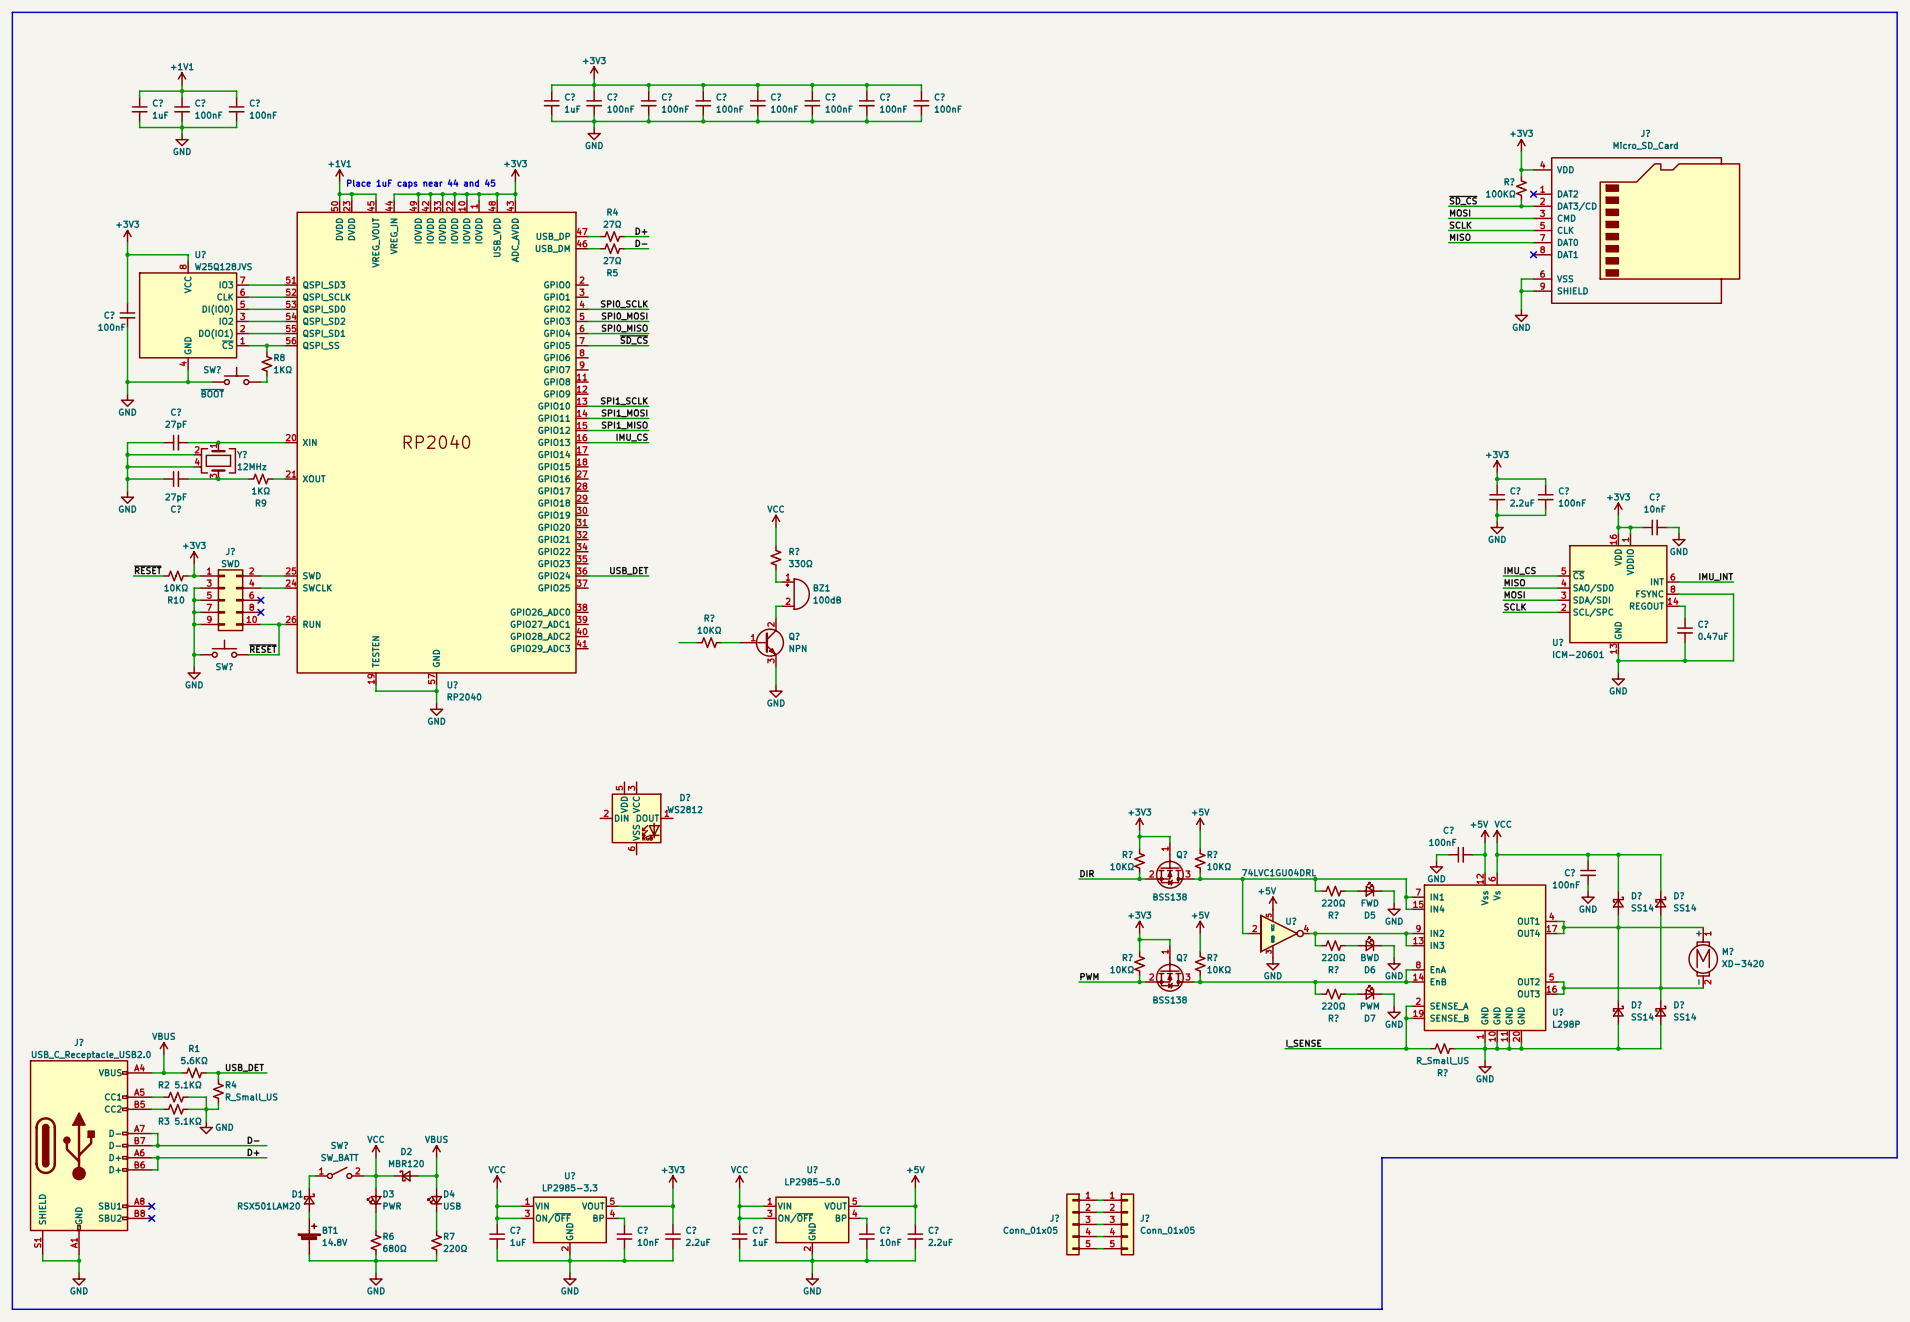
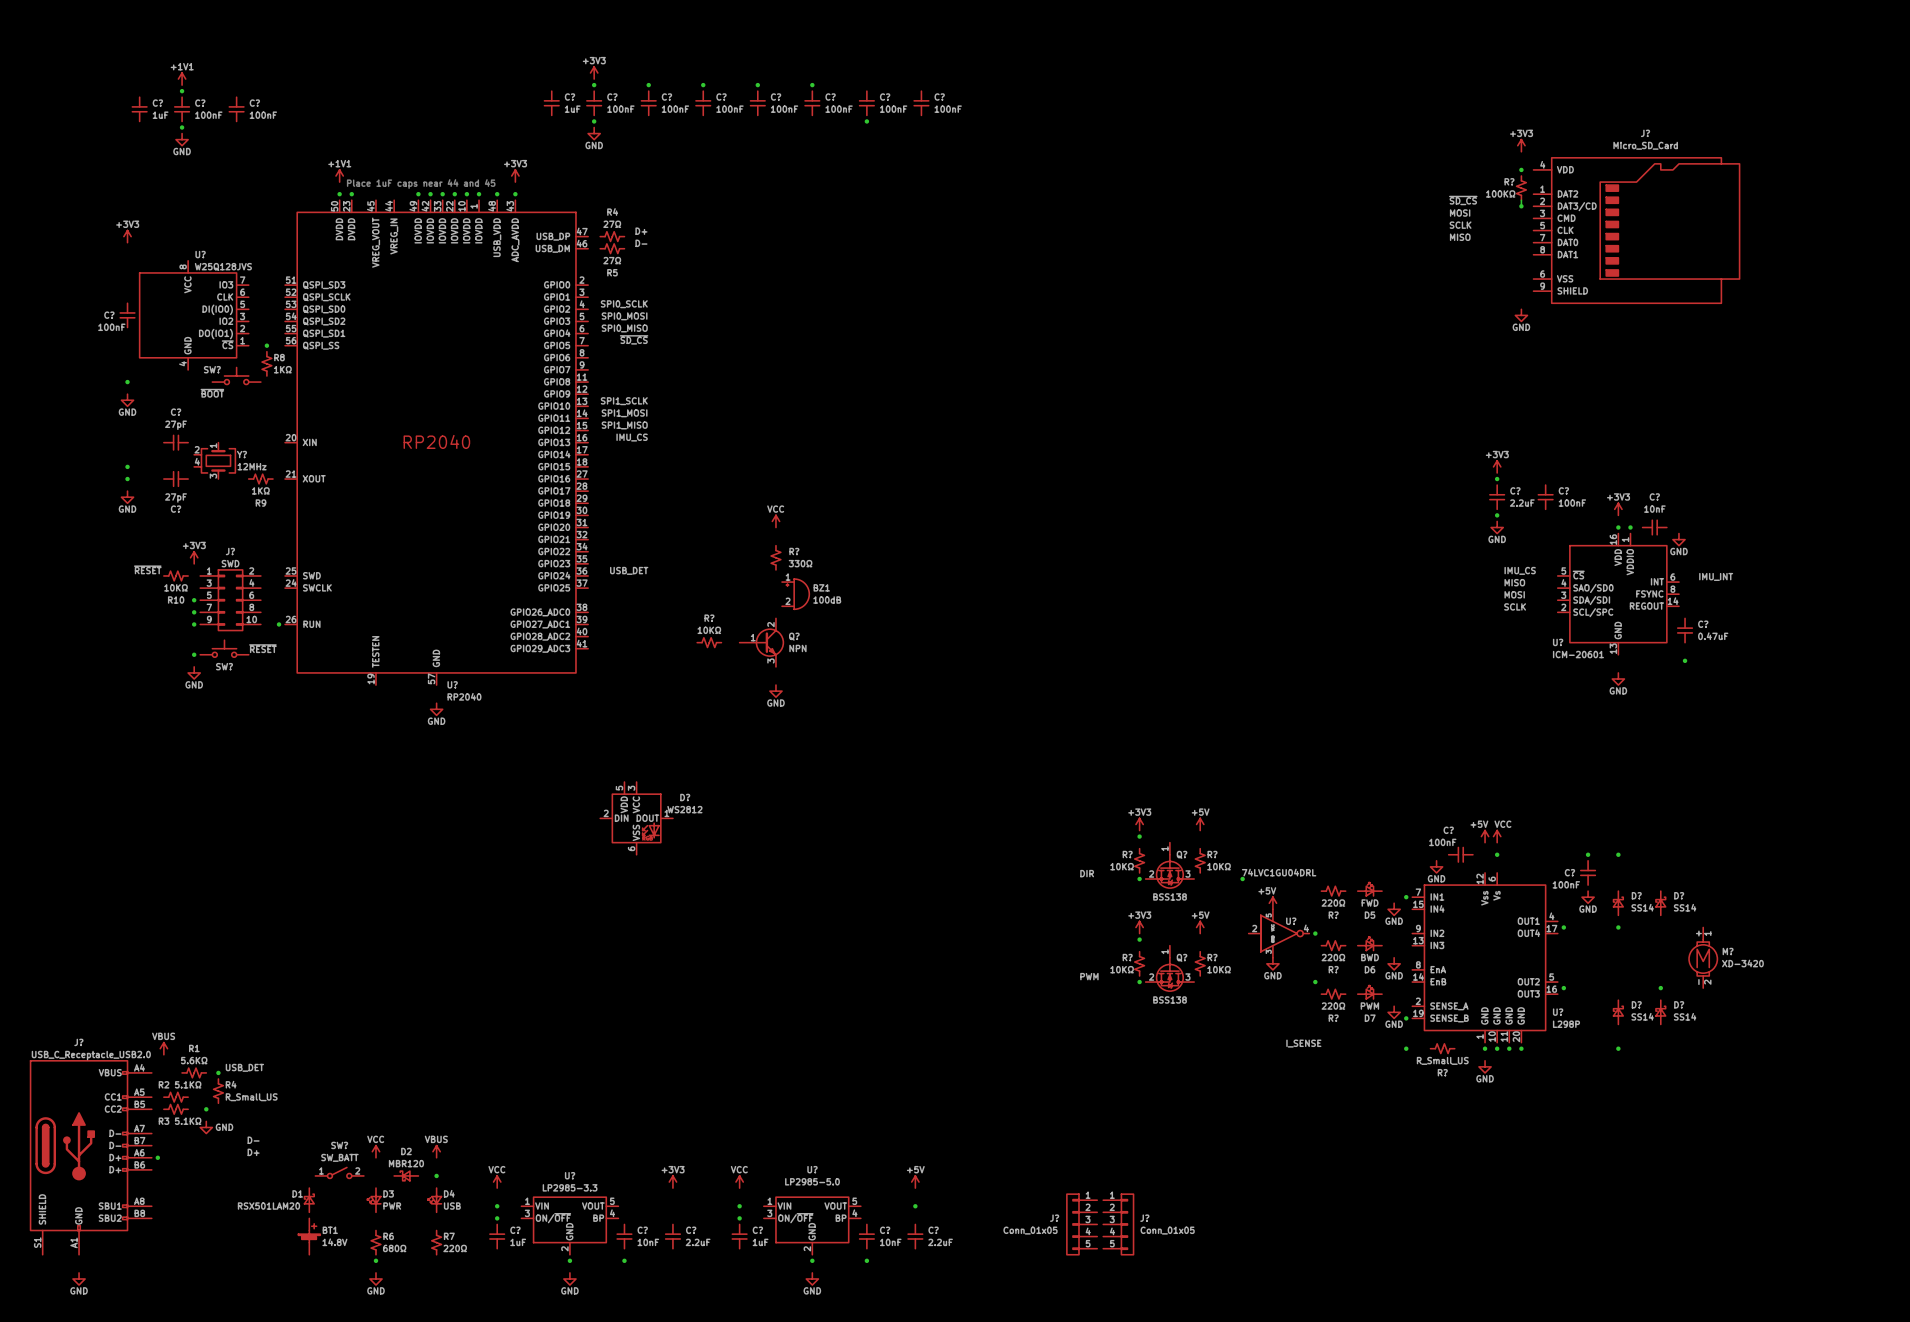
line: (12, 12) (1897, 12) (1897, 1157) (1382, 1157) (1382, 1309) (12, 1309) (12, 12) -> none
wire: (594, 79) (594, 91) -> none
wire: (182, 85) (182, 97) -> none
wire: (648, 85) (648, 91) -> none
wire: (703, 85) (703, 91) -> none
wire: (757, 85) (757, 91) -> none
wire: (812, 85) (812, 91) -> none
wire: (866, 85) (866, 91) -> none
junction: (866, 85) -> none
wire: (551, 91) (551, 85) (921, 85) (921, 91) -> none
wire: (139, 97) (139, 91) (236, 91) (236, 97) -> none
wire: (551, 115) (551, 121) (921, 121) (921, 115) -> none
wire: (594, 115) (594, 127) -> none
wire: (648, 115) (648, 121) -> none
wire: (703, 115) (703, 121) -> none
wire: (757, 115) (757, 121) -> none
wire: (812, 115) (812, 121) -> none
wire: (866, 115) (866, 121) -> none
wire: (139, 121) (139, 127) (236, 127) (236, 121) -> none
wire: (182, 121) (182, 133) -> none
junction: (648, 121) -> none
junction: (703, 121) -> none
junction: (757, 121) -> none
junction: (812, 121) -> none
wire: (1521, 151) (1521, 176) -> none
wire: (1521, 169) (1533, 169) -> none
wire: (339, 182) (339, 200) -> none
wire: (515, 182) (515, 200) -> none
wire: (339, 194) (375, 194) (375, 200) -> none
wire: (351, 194) (351, 200) -> none
wire: (418, 194) (418, 200) -> none
wire: (430, 194) (430, 200) -> none
wire: (442, 194) (442, 200) -> none
wire: (454, 194) (454, 200) -> none
wire: (466, 194) (466, 200) -> none
wire: (479, 194) (479, 200) -> none
wire: (497, 194) (497, 200) -> none
wire: (515, 194) (394, 194) (394, 200) -> none
no-connect mark: (1533, 194) -> none
wire: (1448, 206) (1533, 206) -> none
wire: (1448, 218) (1533, 218) -> none
wire: (1448, 230) (1533, 230) -> none
wire: (588, 236) (600, 236) -> none
wire: (624, 236) (648, 236) -> none
wire: (127, 242) (127, 303) -> none
wire: (1448, 242) (1533, 242) -> none
wire: (588, 248) (600, 248) -> none
wire: (624, 248) (648, 248) -> none
wire: (127, 254) (188, 254) (188, 260) -> none
junction: (127, 254) -> none
no-connect mark: (1533, 254) -> none
wire: (1533, 279) (1521, 279) (1521, 309) -> none
wire: (248, 285) (285, 285) -> none
wire: (1521, 291) (1533, 291) -> none
junction: (1521, 291) -> none
wire: (248, 297) (285, 297) -> none
wire: (248, 309) (285, 309) -> none
wire: (588, 309) (648, 309) -> none
wire: (248, 321) (285, 321) -> none
wire: (588, 321) (648, 321) -> none
wire: (127, 327) (127, 394) -> none
wire: (248, 333) (285, 333) -> none
wire: (588, 333) (648, 333) -> none
wire: (248, 345) (285, 345) -> none
wire: (266, 345) (266, 351) -> none
wire: (588, 345) (648, 345) -> none
wire: (188, 369) (188, 382) -> none
wire: (266, 375) (266, 382) (260, 382) -> none
wire: (127, 382) (212, 382) -> none
junction: (188, 382) -> none
wire: (588, 406) (648, 406) -> none
wire: (588, 418) (648, 418) -> none
wire: (588, 430) (648, 430) -> none
wire: (163, 442) (127, 442) (127, 491) -> none
wire: (188, 442) (285, 442) -> none
junction: (218, 442) -> none
wire: (588, 442) (648, 442) -> none
wire: (127, 454) (194, 454) -> none
junction: (127, 454) -> none
wire: (127, 466) (194, 466) -> none
wire: (1497, 472) (1497, 485) -> none
wire: (127, 479) (163, 479) -> none
wire: (188, 479) (248, 479) -> none
junction: (218, 479) -> none
wire: (272, 479) (285, 479) -> none
wire: (1497, 479) (1545, 479) (1545, 485) -> none
wire: (1497, 509) (1497, 521) -> none
wire: (1545, 509) (1545, 515) (1497, 515) -> none
wire: (1618, 515) (1618, 533) -> none
wire: (775, 527) (775, 545) -> none
wire: (1618, 527) (1642, 527) -> none
wire: (1630, 527) (1630, 533) -> none
wire: (1666, 527) (1678, 527) (1678, 533) -> none
wire: (194, 563) (194, 575) -> none
wire: (775, 569) (775, 582) (782, 582) -> none
wire: (133, 575) (163, 575) -> none
wire: (188, 575) (200, 575) -> none
junction: (194, 575) -> none
wire: (260, 575) (285, 575) -> none
wire: (588, 575) (648, 575) -> none
wire: (1503, 575) (1557, 575) -> none
wire: (1678, 582) (1733, 582) -> none
wire: (200, 588) (194, 588) (194, 666) -> none
wire: (260, 588) (285, 588) -> none
wire: (1503, 588) (1557, 588) -> none
wire: (1678, 594) (1733, 594) (1733, 660) (1618, 660) -> none
wire: (194, 600) (200, 600) -> none
no-connect mark: (260, 600) -> none
wire: (1503, 600) (1557, 600) -> none
wire: (782, 606) (775, 606) (775, 618) -> none
wire: (1678, 606) (1685, 606) (1685, 618) -> none
wire: (194, 612) (200, 612) -> none
no-connect mark: (260, 612) -> none
wire: (1503, 612) (1557, 612) -> none
wire: (194, 624) (200, 624) -> none
wire: (260, 624) (285, 624) -> none
wire: (279, 624) (279, 654) (248, 654) -> none
wire: (679, 642) (697, 642) -> none
wire: (721, 642) (739, 642) -> none
wire: (1685, 642) (1685, 660) -> none
wire: (194, 654) (200, 654) -> none
wire: (1618, 654) (1618, 672) -> none
junction: (1618, 660) -> none
wire: (775, 666) (775, 685) -> none
wire: (375, 685) (375, 691) (436, 691) -> none
wire: (436, 685) (436, 703) -> none
junction: (436, 691) -> none
wire: (1139, 830) (1139, 848) -> none
wire: (1200, 830) (1200, 848) -> none
wire: (1139, 836) (1169, 836) (1169, 842) -> none
wire: (1485, 842) (1485, 872) -> none
wire: (1497, 842) (1497, 872) -> none
wire: (1448, 854) (1436, 854) (1436, 860) -> none
wire: (1472, 854) (1485, 854) -> none
junction: (1485, 854) -> none
wire: (1497, 854) (1660, 854) (1660, 891) -> none
wire: (1588, 854) (1588, 860) -> none
wire: (1618, 854) (1618, 891) -> none
wire: (1139, 872) (1139, 879) -> none
wire: (1200, 872) (1200, 879) -> none
wire: (1079, 879) (1145, 879) -> none
wire: (1194, 879) (1406, 879) (1406, 909) (1412, 909) -> none
junction: (1200, 879) -> none
wire: (1242, 879) (1242, 933) (1248, 933) -> none
wire: (1315, 879) (1315, 891) (1321, 891) -> none
junction: (1315, 879) -> none
wire: (1588, 885) (1588, 891) -> none
wire: (1345, 891) (1357, 891) -> none
wire: (1382, 891) (1394, 891) (1394, 903) -> none
wire: (1406, 897) (1412, 897) -> none
wire: (1618, 915) (1618, 1000) -> none
wire: (1660, 915) (1660, 1000) -> none
wire: (1557, 921) (1563, 921) (1563, 933) (1557, 933) -> none
wire: (1563, 927) (1703, 927) -> none
wire: (1139, 933) (1139, 951) -> none
wire: (1200, 933) (1200, 951) -> none
wire: (1309, 933) (1412, 933) -> none
wire: (1315, 933) (1315, 945) (1321, 945) -> none
wire: (1406, 933) (1406, 945) (1412, 945) -> none
junction: (1406, 933) -> none
wire: (1139, 939) (1169, 939) (1169, 945) -> none
wire: (1345, 945) (1357, 945) -> none
wire: (1382, 945) (1394, 945) (1394, 957) -> none
wire: (1412, 969) (1406, 969) (1406, 982) -> none
wire: (1139, 975) (1139, 982) -> none
wire: (1200, 975) (1200, 982) -> none
wire: (1079, 982) (1145, 982) -> none
wire: (1194, 982) (1412, 982) -> none
junction: (1200, 982) -> none
wire: (1315, 982) (1315, 994) (1321, 994) -> none
junction: (1406, 982) -> none
wire: (1557, 982) (1563, 982) (1563, 994) (1557, 994) -> none
wire: (1563, 988) (1703, 988) -> none
wire: (1345, 994) (1357, 994) -> none
wire: (1382, 994) (1394, 994) (1394, 1006) -> none
wire: (1412, 1006) (1406, 1006) (1406, 1048) -> none
wire: (1406, 1018) (1412, 1018) -> none
wire: (1618, 1024) (1618, 1048) -> none
wire: (1660, 1024) (1660, 1048) (1454, 1048) -> none
wire: (1485, 1042) (1485, 1060) -> none
wire: (1497, 1042) (1497, 1048) -> none
wire: (1509, 1042) (1509, 1048) -> none
wire: (1521, 1042) (1521, 1048) -> none
wire: (1285, 1048) (1430, 1048) -> none
wire: (163, 1054) (163, 1072) -> none
wire: (151, 1072) (182, 1072) -> none
junction: (163, 1072) -> none
wire: (206, 1072) (266, 1072) -> none
wire: (218, 1072) (218, 1079) -> none
wire: (151, 1097) (163, 1097) -> none
wire: (188, 1097) (206, 1097) (206, 1121) -> none
wire: (218, 1103) (218, 1109) (188, 1109) -> none
wire: (151, 1109) (163, 1109) -> none
wire: (151, 1133) (157, 1133) (157, 1145) -> none
wire: (151, 1145) (266, 1145) -> none
junction: (157, 1145) -> none
wire: (151, 1157) (266, 1157) -> none
wire: (157, 1157) (157, 1169) (151, 1169) -> none
wire: (375, 1157) (375, 1188) -> none
wire: (436, 1157) (436, 1188) -> none
wire: (315, 1175) (309, 1175) (309, 1188) -> none
wire: (363, 1175) (394, 1175) -> none
junction: (375, 1175) -> none
wire: (418, 1175) (436, 1175) -> none
wire: (497, 1188) (497, 1224) -> none
wire: (672, 1188) (672, 1224) -> none
wire: (739, 1188) (739, 1224) -> none
wire: (915, 1188) (915, 1224) -> none
wire: (1097, 1200) (1103, 1200) -> none
no-connect mark: (151, 1206) -> none
wire: (497, 1206) (521, 1206) -> none
wire: (618, 1206) (672, 1206) -> none
junction: (672, 1206) -> none
wire: (739, 1206) (763, 1206) -> none
wire: (860, 1206) (915, 1206) -> none
wire: (309, 1212) (309, 1218) -> none
wire: (375, 1212) (375, 1230) -> none
wire: (436, 1212) (436, 1230) -> none
wire: (1097, 1212) (1103, 1212) -> none
no-connect mark: (151, 1218) -> none
wire: (497, 1218) (521, 1218) -> none
wire: (618, 1218) (624, 1218) (624, 1224) -> none
wire: (739, 1218) (763, 1218) -> none
wire: (860, 1218) (866, 1218) (866, 1224) -> none
wire: (1097, 1224) (1103, 1224) -> none
wire: (1097, 1236) (1103, 1236) -> none
wire: (497, 1248) (497, 1260) (672, 1260) (672, 1248) -> none
wire: (624, 1248) (624, 1260) -> none
wire: (739, 1248) (739, 1260) (915, 1260) (915, 1248) -> none
wire: (866, 1248) (866, 1260) -> none
wire: (1097, 1248) (1103, 1248) -> none
wire: (42, 1254) (42, 1260) (79, 1260) -> none
wire: (79, 1254) (79, 1272) -> none
wire: (309, 1254) (309, 1260) (436, 1260) (436, 1254) -> none
wire: (375, 1254) (375, 1272) -> none
wire: (569, 1254) (569, 1272) -> none
wire: (812, 1254) (812, 1272) -> none
junction: (79, 1260) -> none

